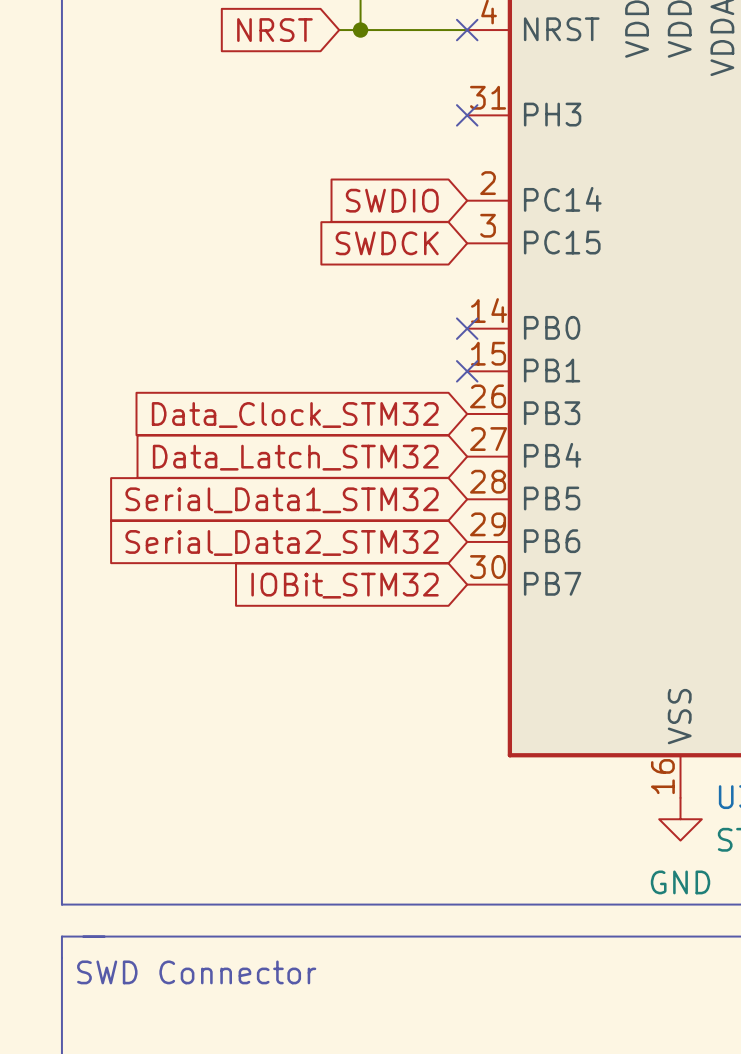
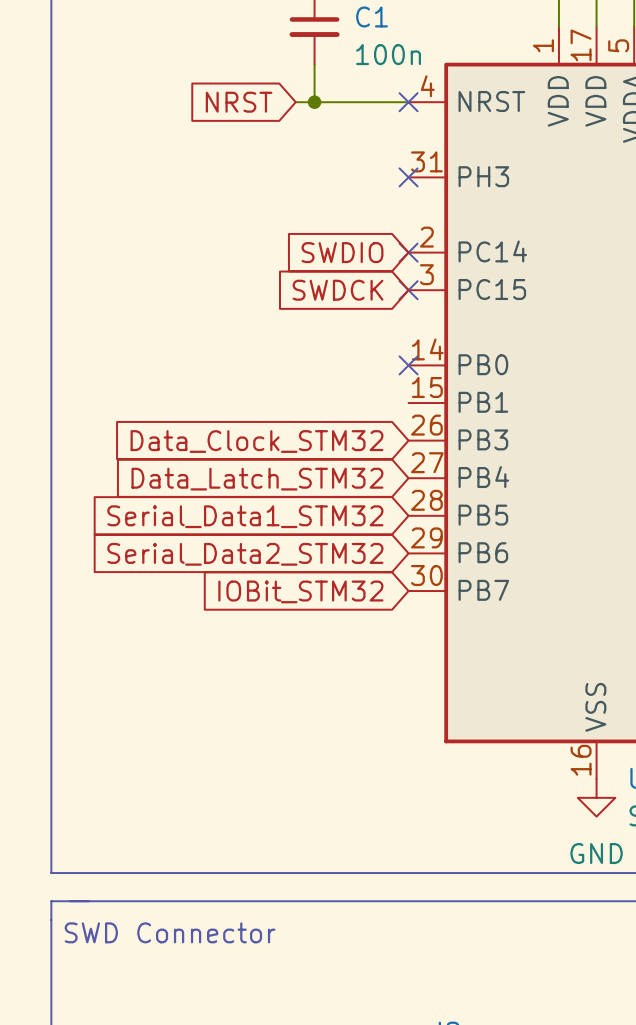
no-connect mark: none -> (408, 252)
no-connect mark: none -> (408, 290)
no-connect mark: (467, 371) -> none

